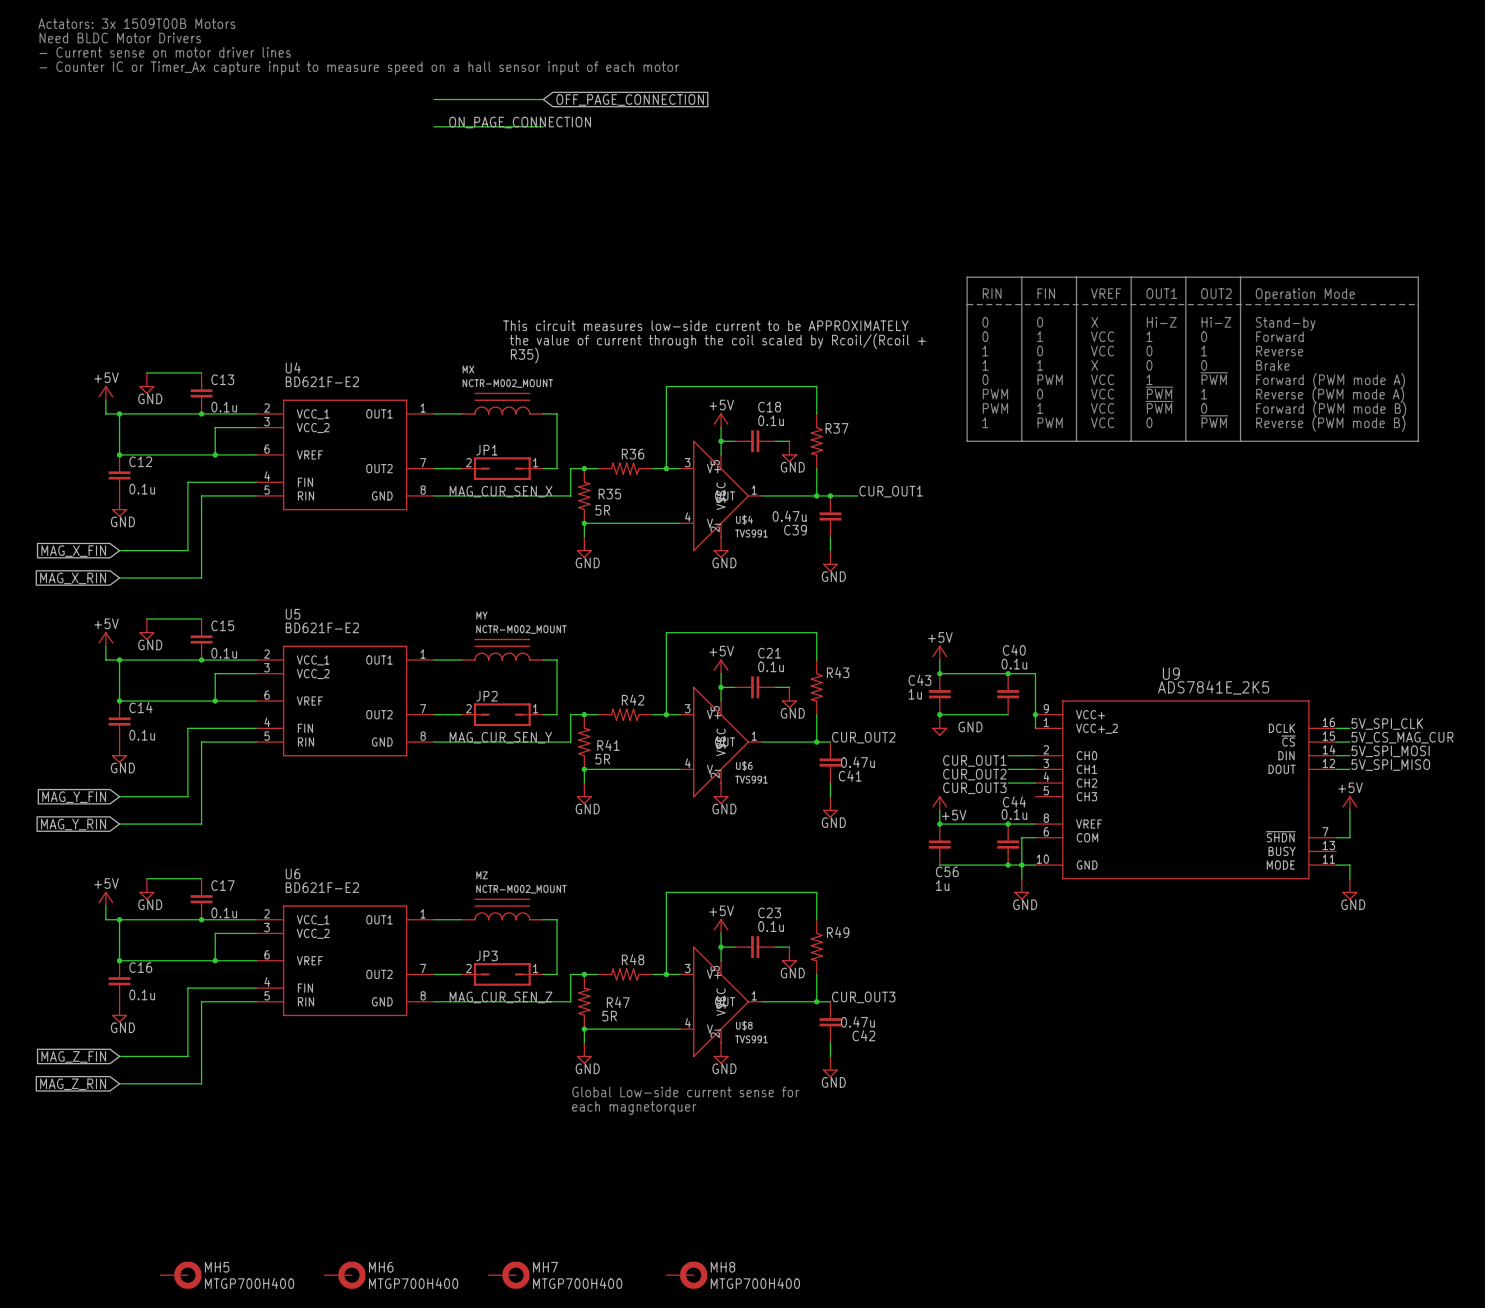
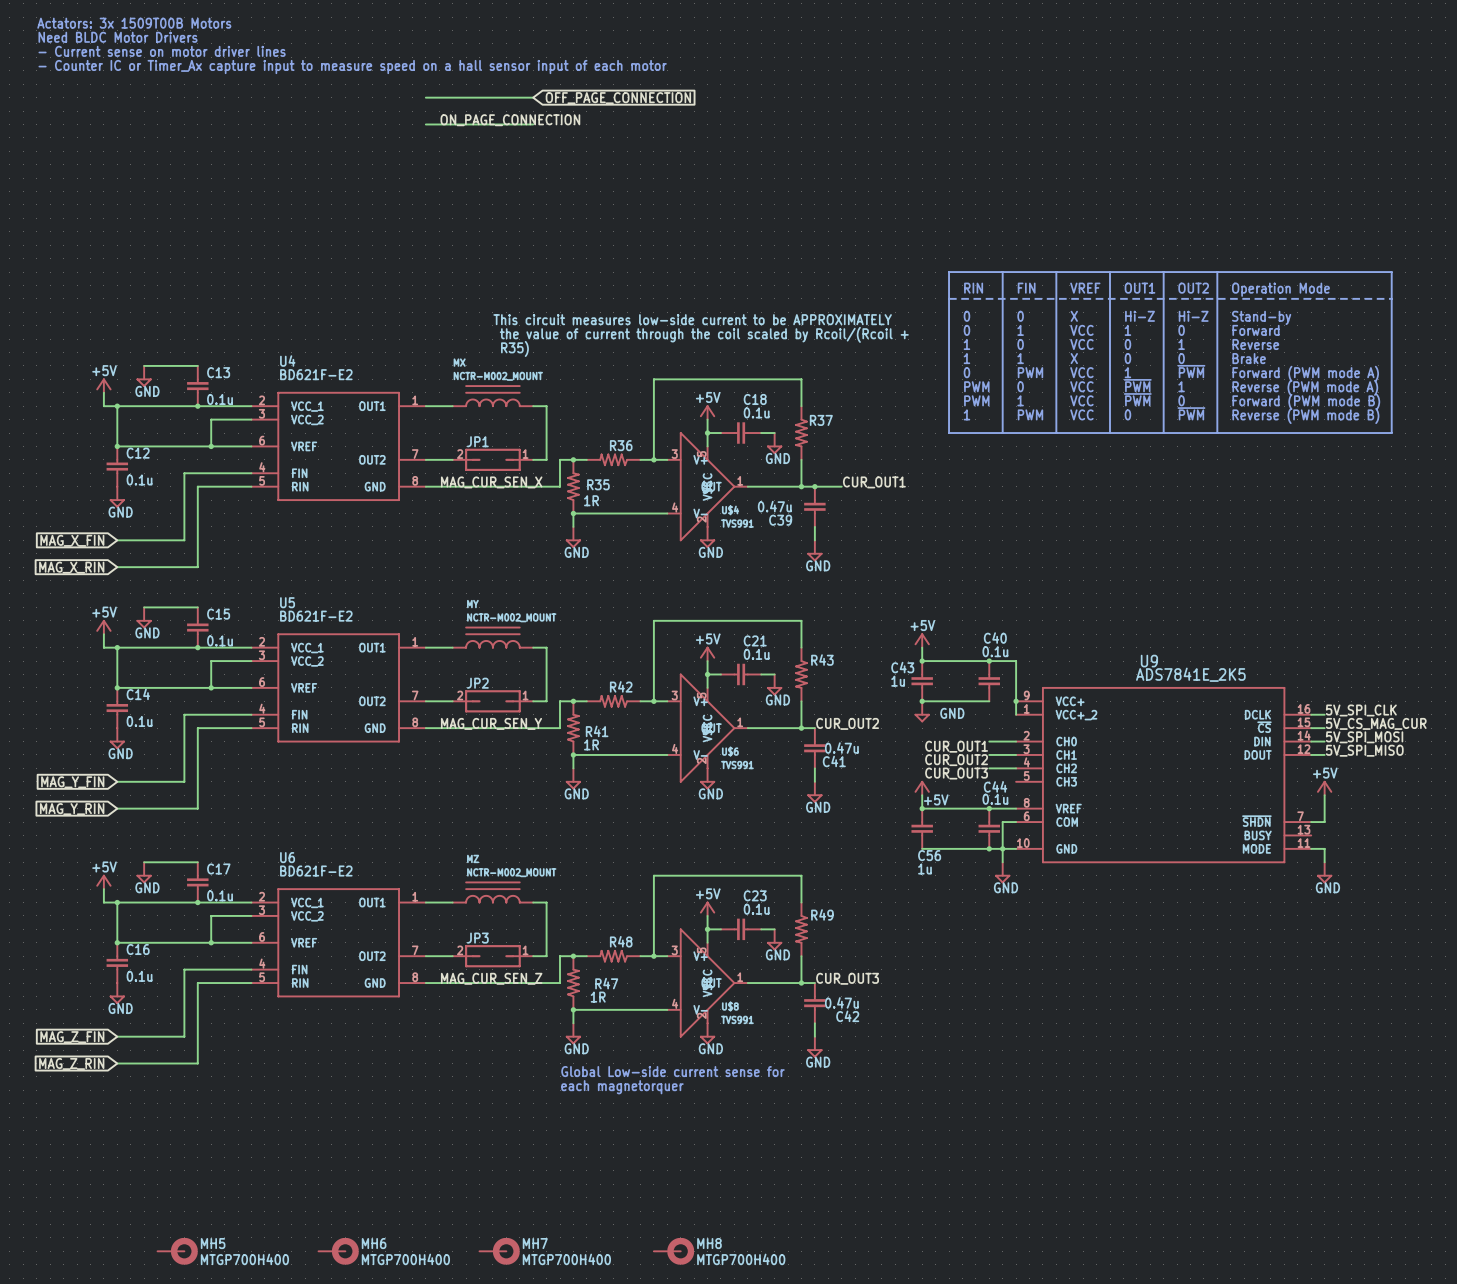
R35 value: 5R (602, 510) -> 1R (591, 500)
R41 value: 5R (602, 759) -> 1R (591, 744)
R47 value: 5R (609, 1016) -> 1R (598, 997)

